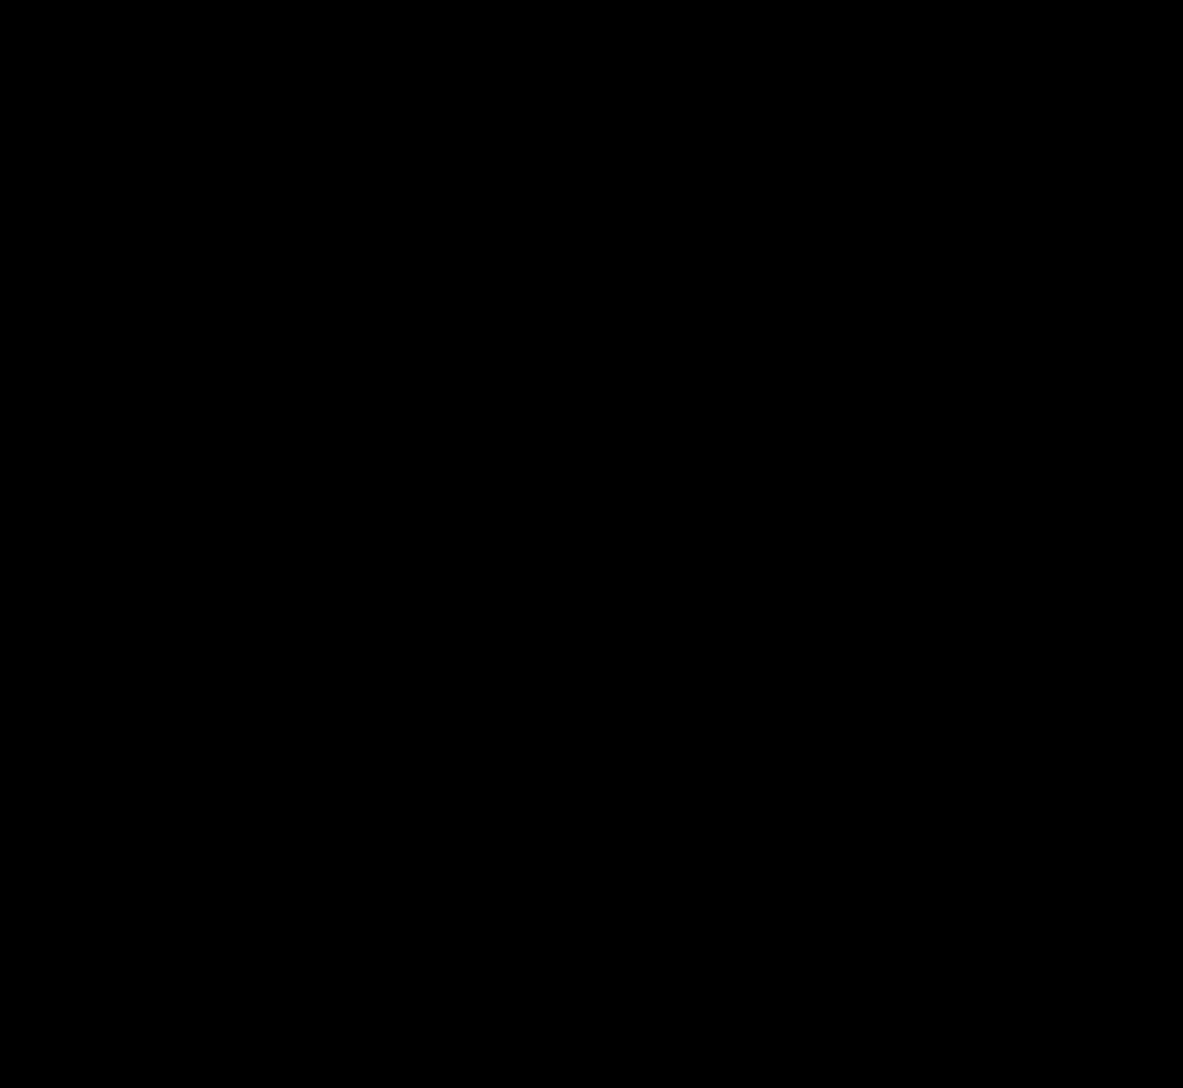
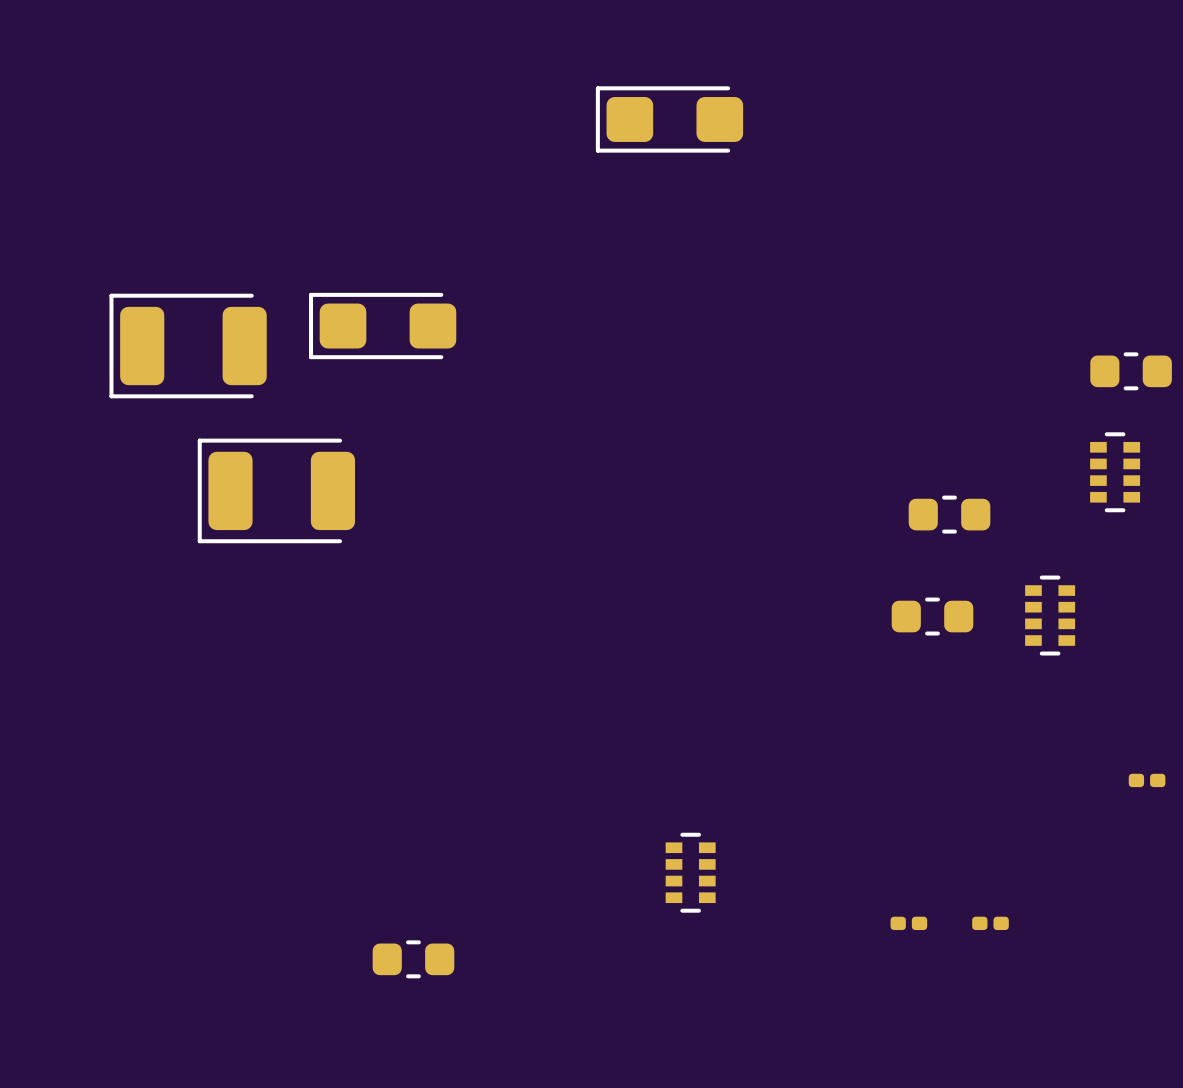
part: none -> (669, 119)
part: none -> (382, 326)
part: none -> (188, 346)
part: none -> (1131, 371)
part: none -> (1115, 472)
part: none -> (276, 490)
part: none -> (949, 514)
part: none -> (1050, 615)
part: none -> (932, 616)
part: none -> (1147, 780)
part: none -> (690, 872)
part: none -> (908, 923)
part: none -> (990, 923)
part: none -> (413, 959)

